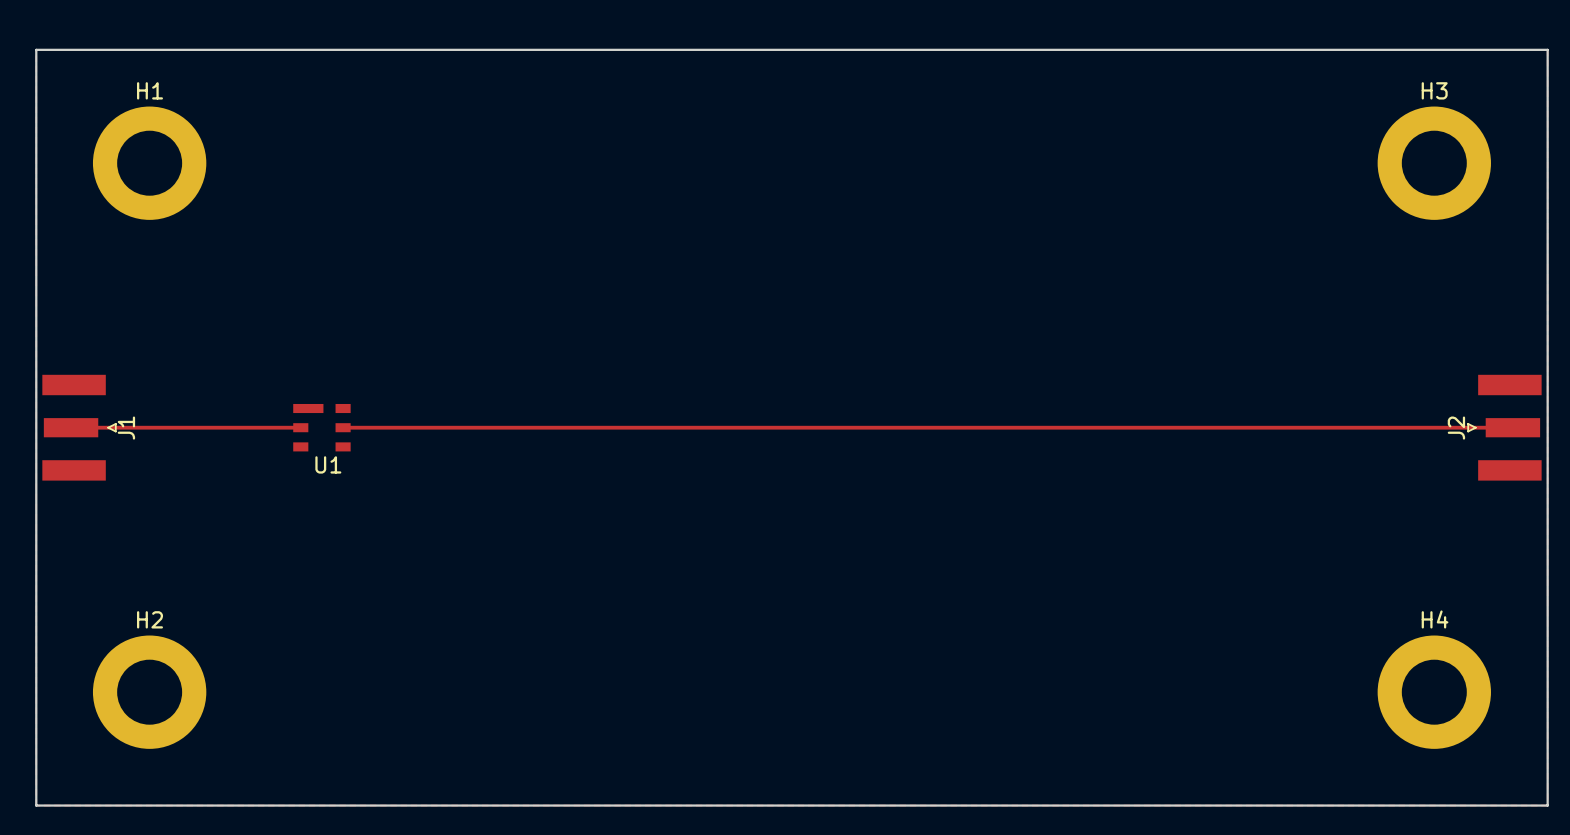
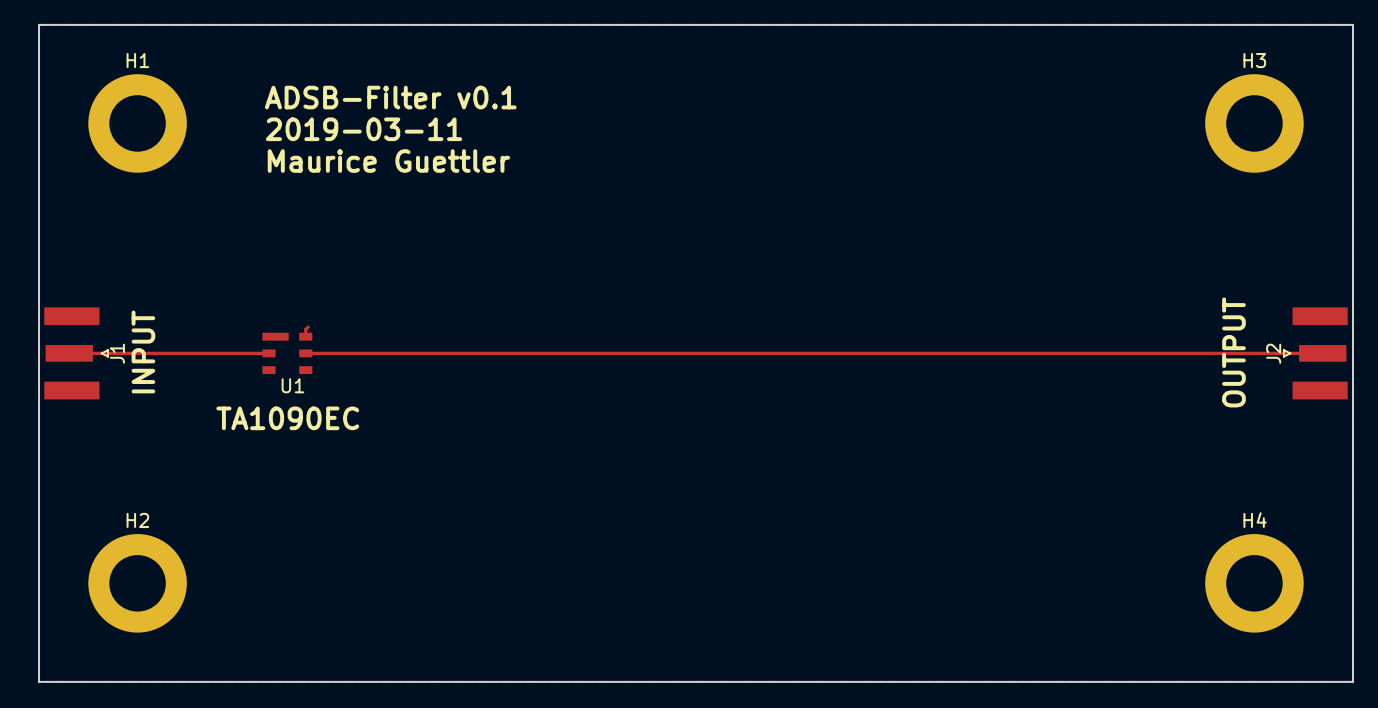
text: none -> ADSB-Filter v0.1 (390, 97)
text: none -> 2019-03-11 (364, 129)
text: none -> Maurice Guettler (388, 161)
track: none -> (308, 327) (305, 329) (305, 336)
text: none -> INPUT (143, 351)
text: none -> OUTPUT (1233, 352)
text: none -> TA1090EC (287, 418)

